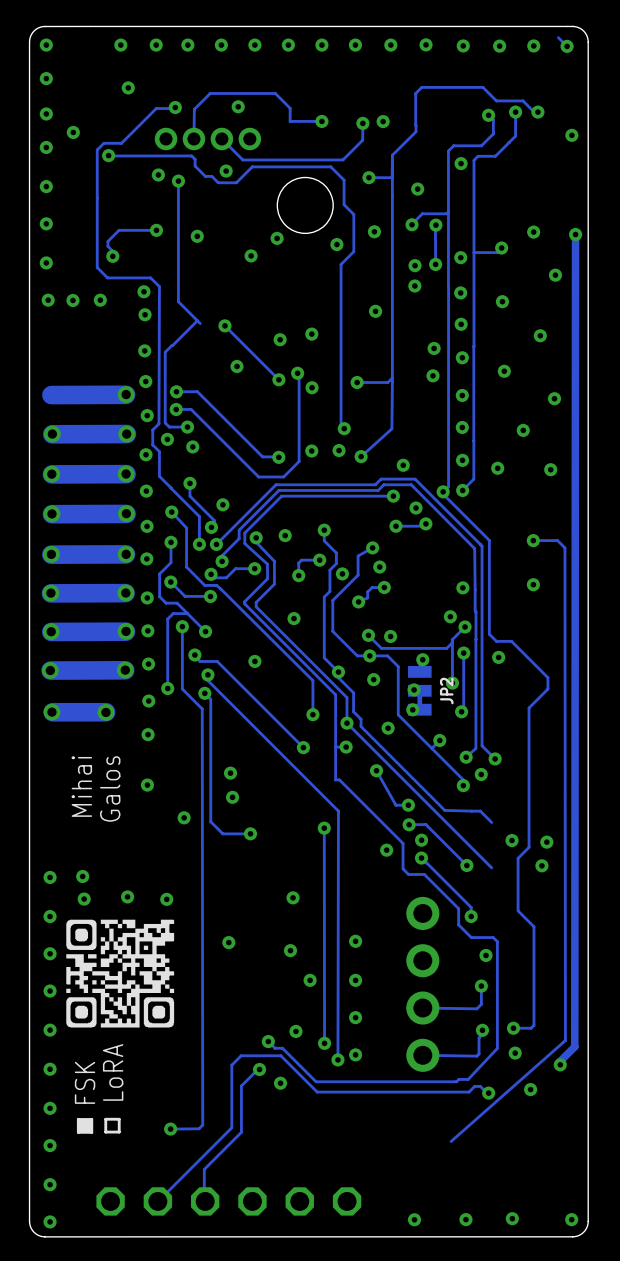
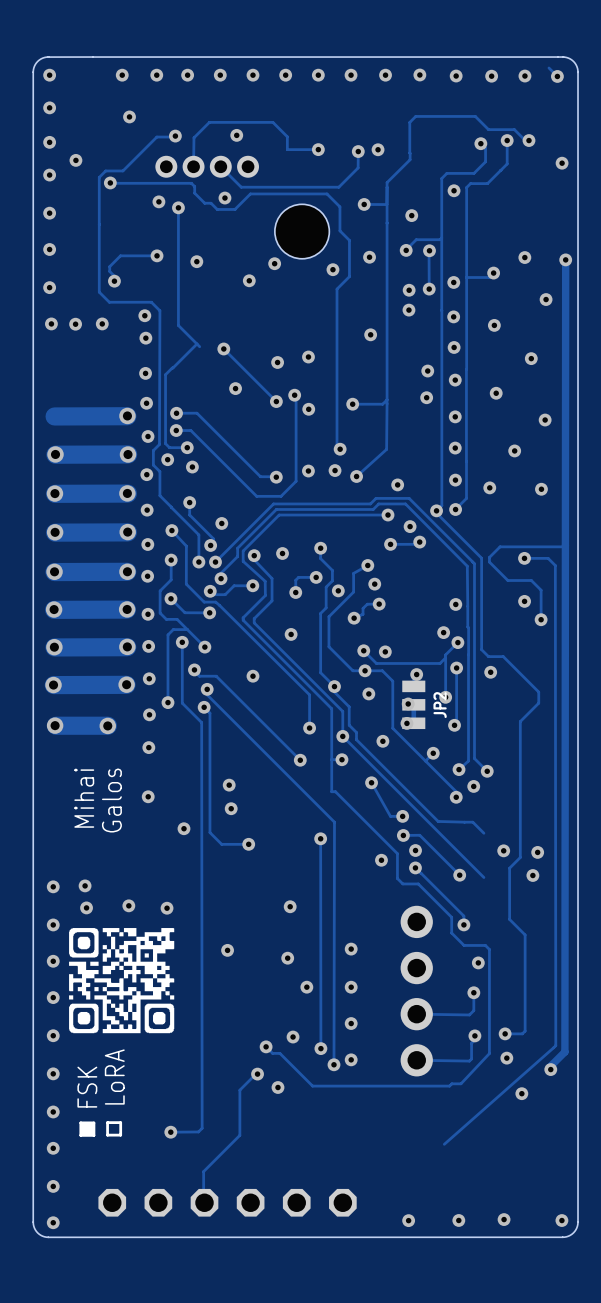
track: none -> (565, 545) (500, 546) (489, 557) (489, 562) (507, 580) (531, 580) (541, 590) (541, 619)
via: none -> (541, 619)
track: (488, 1093) (480, 1086) (474, 1086) (469, 1092) (317, 1092) (280, 1055) (241, 1055) (231, 1065) (231, 1127) (157, 1201) -> none
via: (488, 1093) -> none

